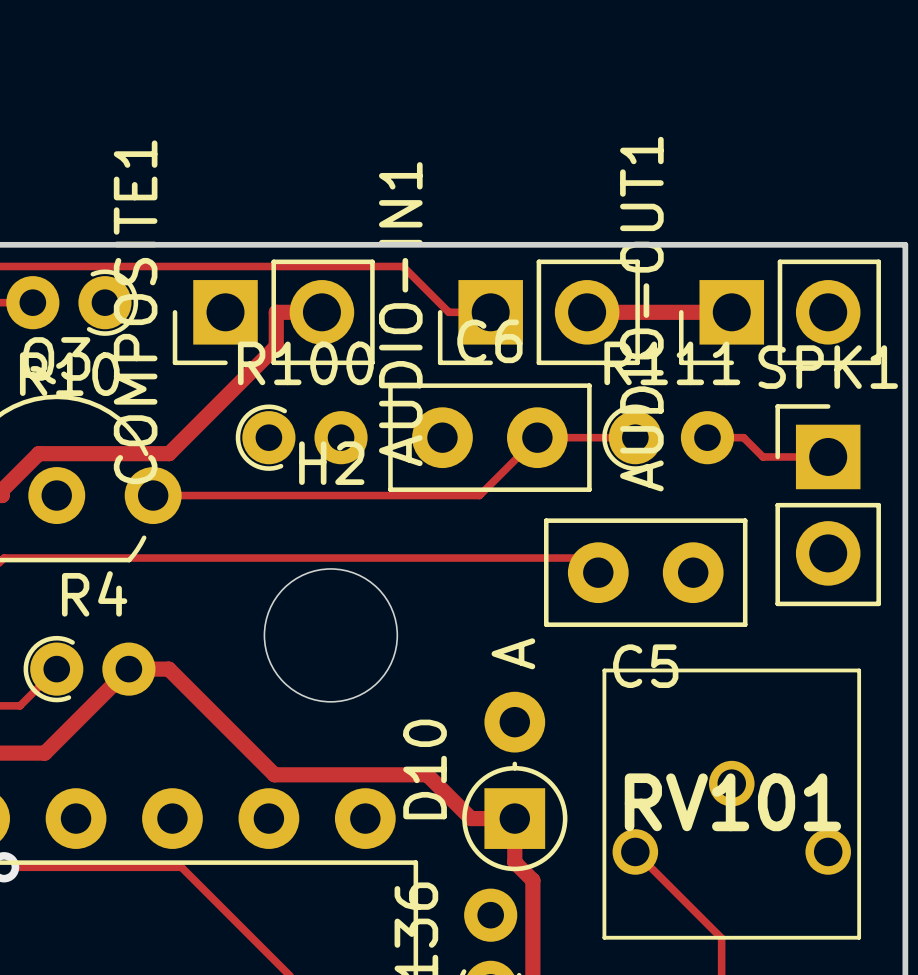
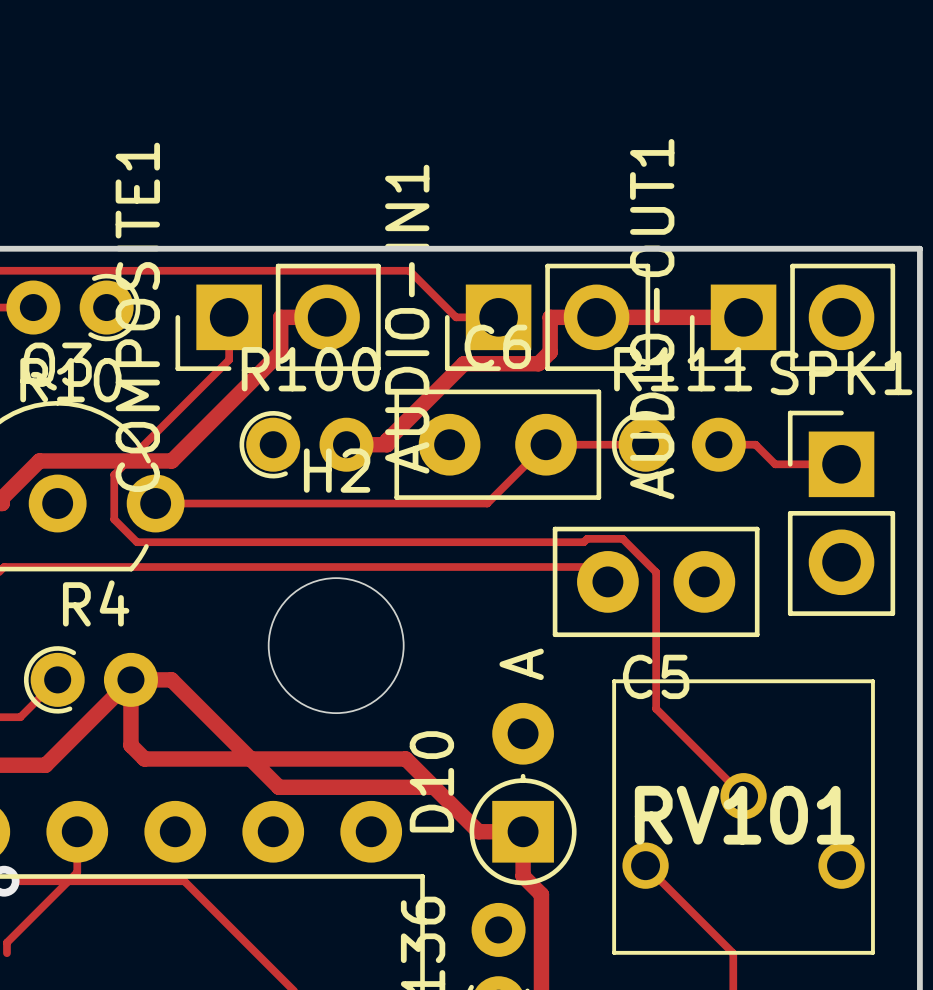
track: none -> (229, 317) (229, 359) (114, 474) (114, 519) (136, 542) (583, 542) (587, 538) (622, 538) (656, 572) (656, 708) (743, 796)
track: none -> (596, 317) (550, 317) (550, 352) (538, 363) (463, 363) (387, 440) (387, 444) (346, 444)
track: none -> (130, 679) (130, 745) (144, 758) (405, 758) (434, 787)
track: none -> (77, 831) (77, 872) (6, 942) (6, 953)

